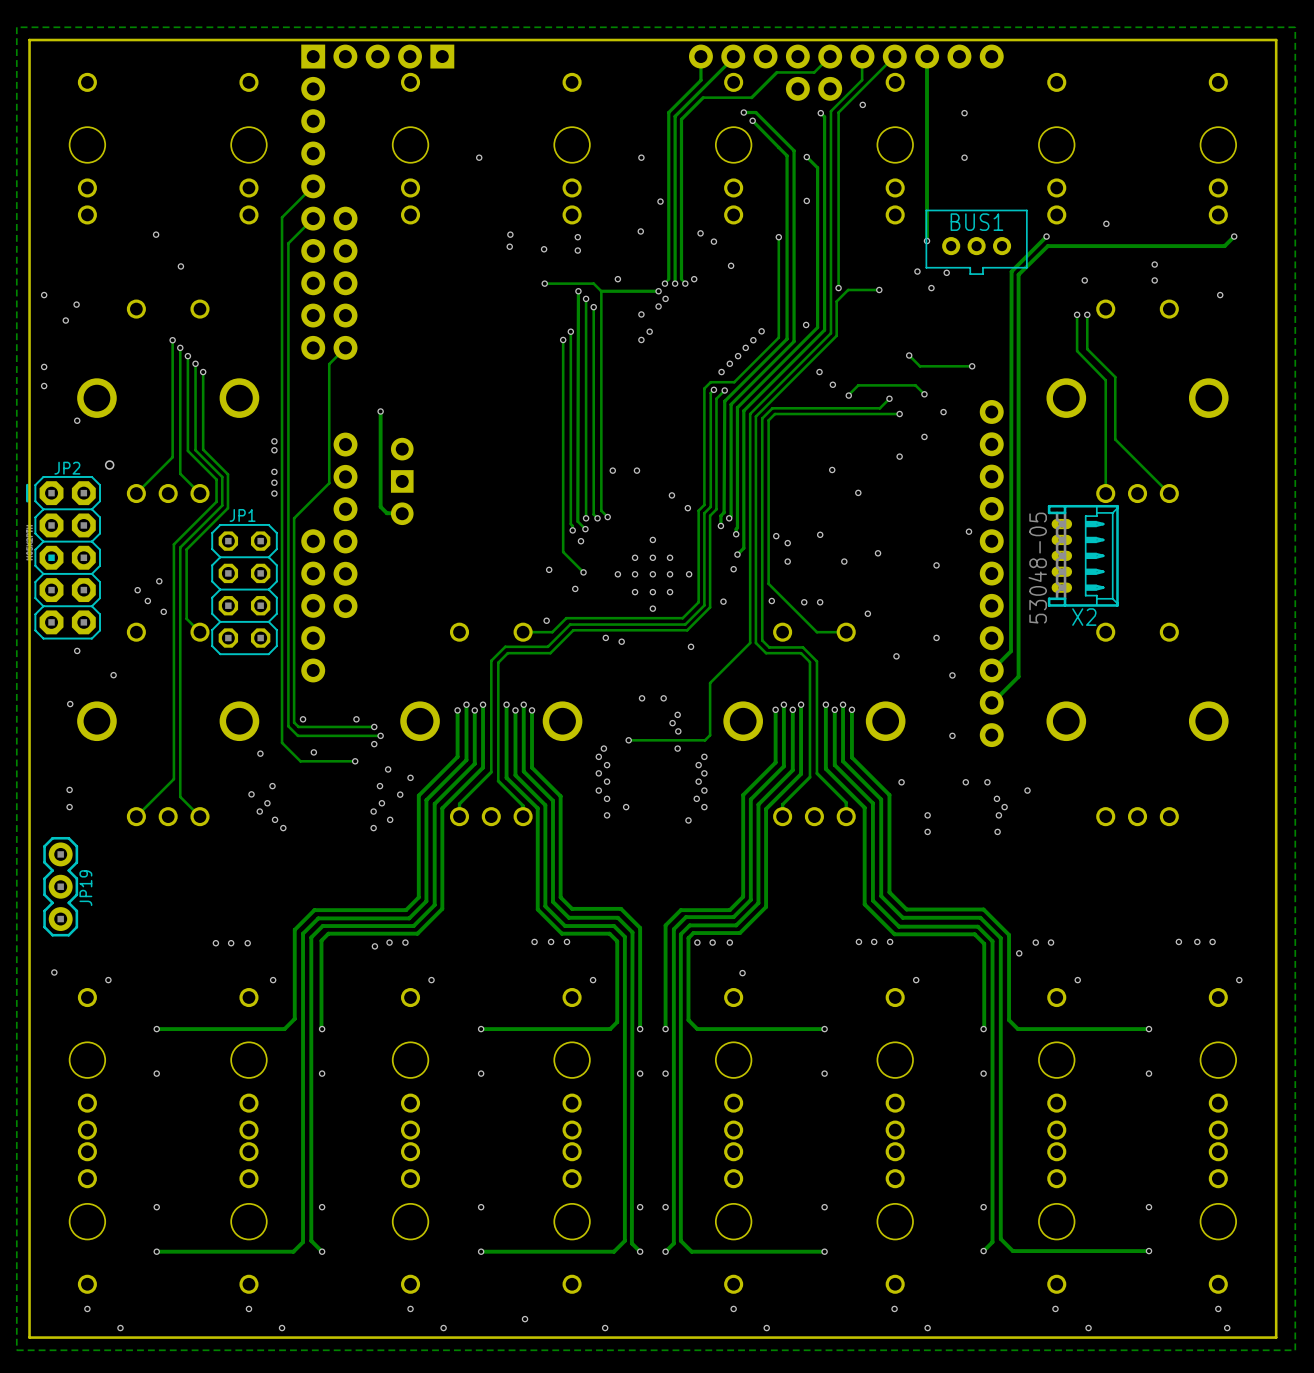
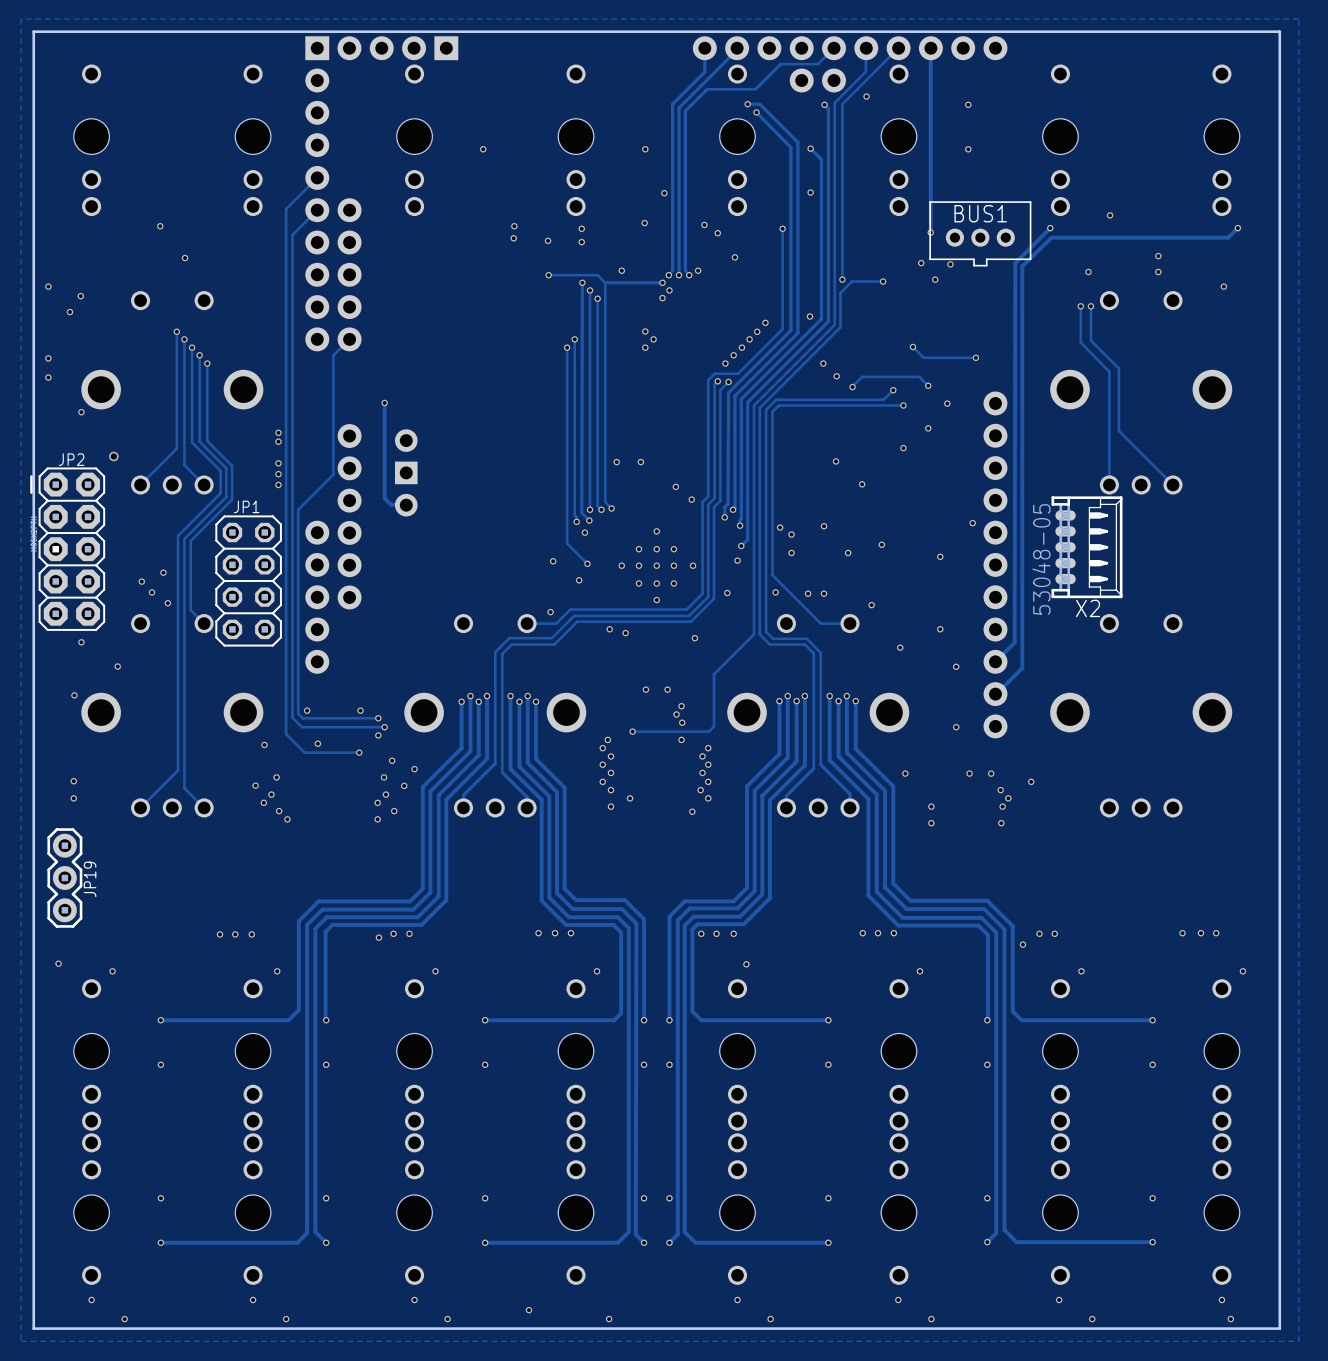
via: (641, 314) -> none
track: (570, 331) (570, 347) -> none
via: (570, 331) -> none
via: (649, 331) -> none
track: (563, 339) (563, 356) -> none
via: (563, 339) -> none
via: none -> (574, 339)
via: none -> (653, 339)
via: none -> (567, 347)
via: none -> (645, 347)

